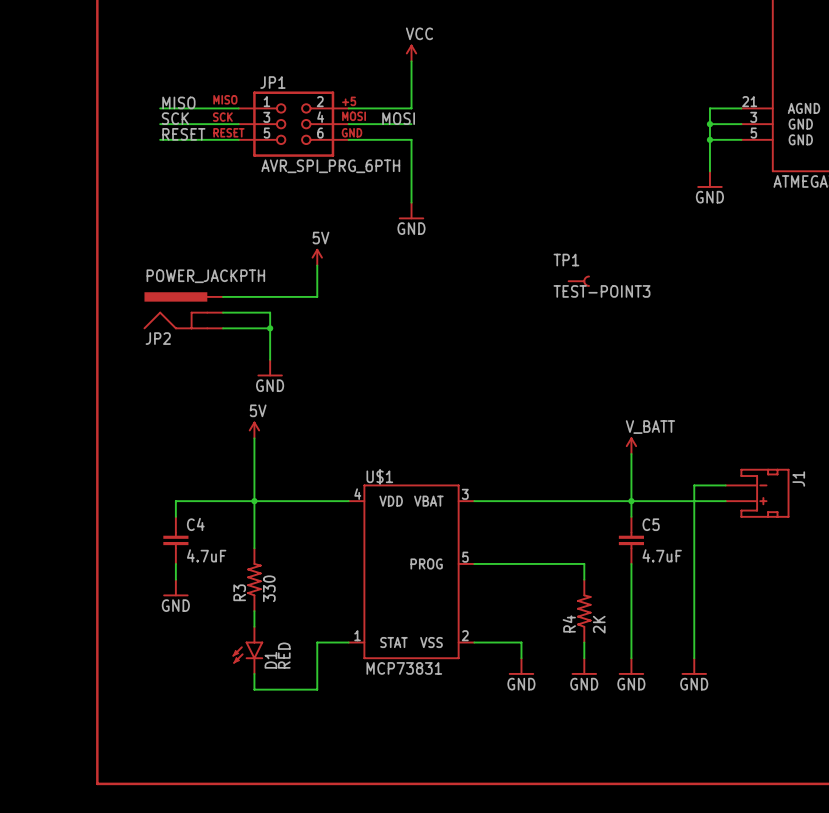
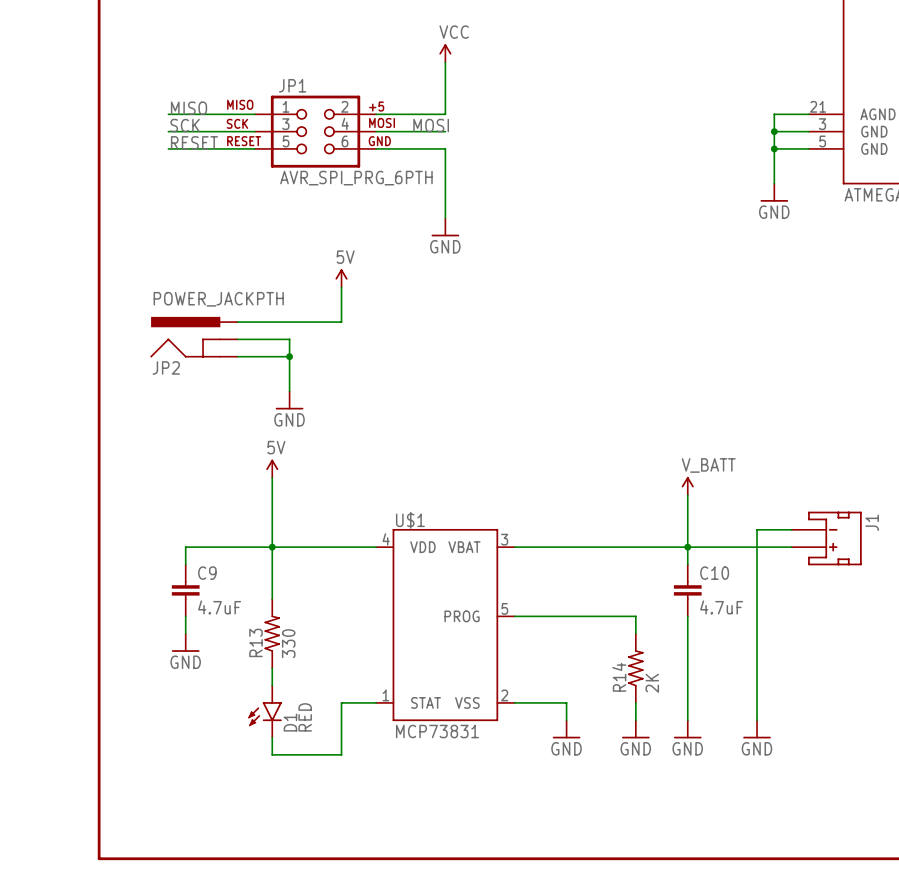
TP1: TEST-POINT3 (578, 281) -> none
C4 name: C4 (195, 524) -> C9 (207, 573)
C5 name: C5 (651, 524) -> C10 (714, 573)
R3 name: R3 (239, 592) -> R13 (255, 642)
R4 name: R4 (569, 623) -> R14 (619, 677)

